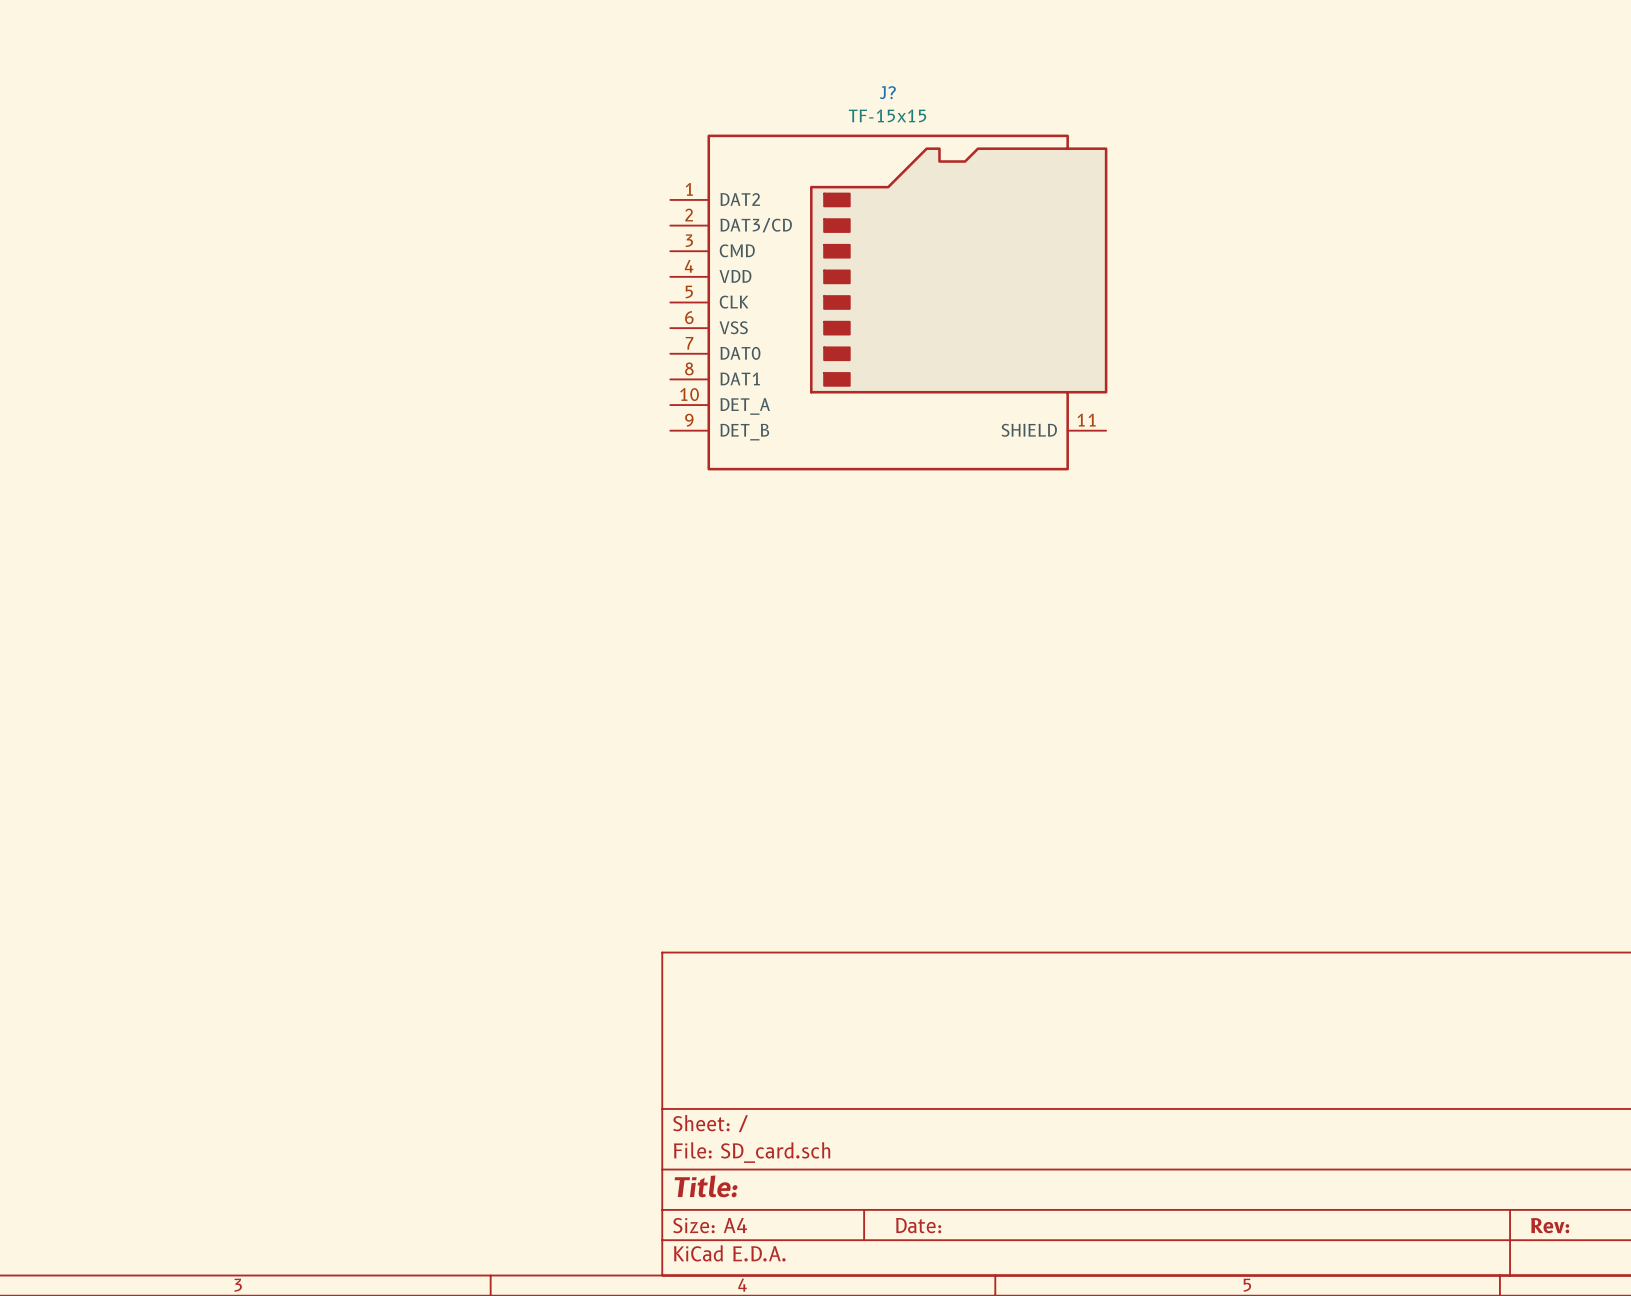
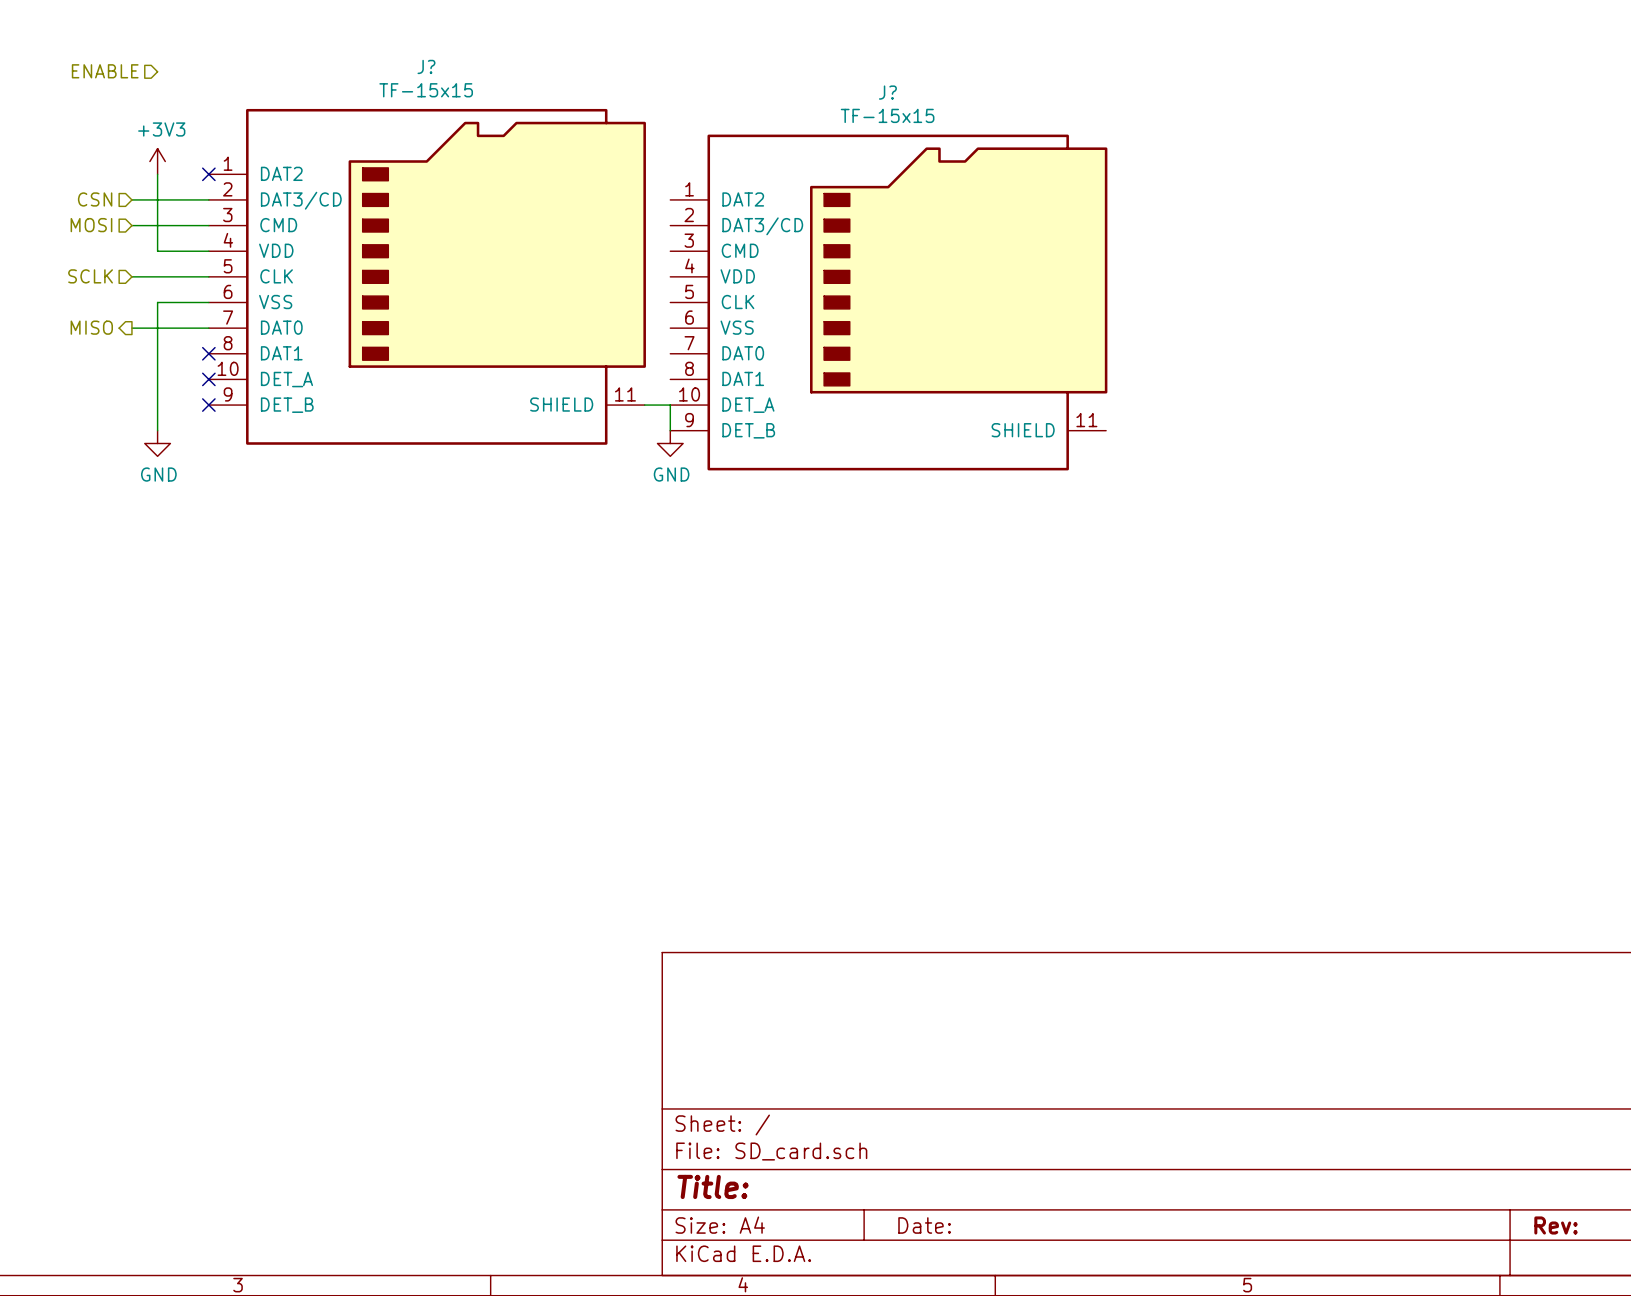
hierarchical label: none -> ENABLE (105, 71)
power symbol: none -> +3V3 (157, 161)
wire: none -> (157, 174) (157, 251) (208, 251)
no-connect mark: none -> (208, 174)
hierarchical label: none -> CSN (95, 199)
wire: none -> (131, 199) (208, 199)
hierarchical label: none -> MOSI (91, 225)
wire: none -> (131, 225) (208, 225)
hierarchical label: none -> SCLK (90, 276)
wire: none -> (131, 276) (208, 276)
J?: none -> TF-15x15 (427, 276)
wire: none -> (208, 302) (157, 302) (157, 430)
hierarchical label: none -> MISO (91, 327)
wire: none -> (131, 328) (208, 328)
no-connect mark: none -> (208, 353)
no-connect mark: none -> (208, 379)
no-connect mark: none -> (208, 405)
wire: none -> (644, 405) (670, 405) (670, 430)
power symbol: none -> GND (157, 443)
power symbol: none -> GND (670, 443)

